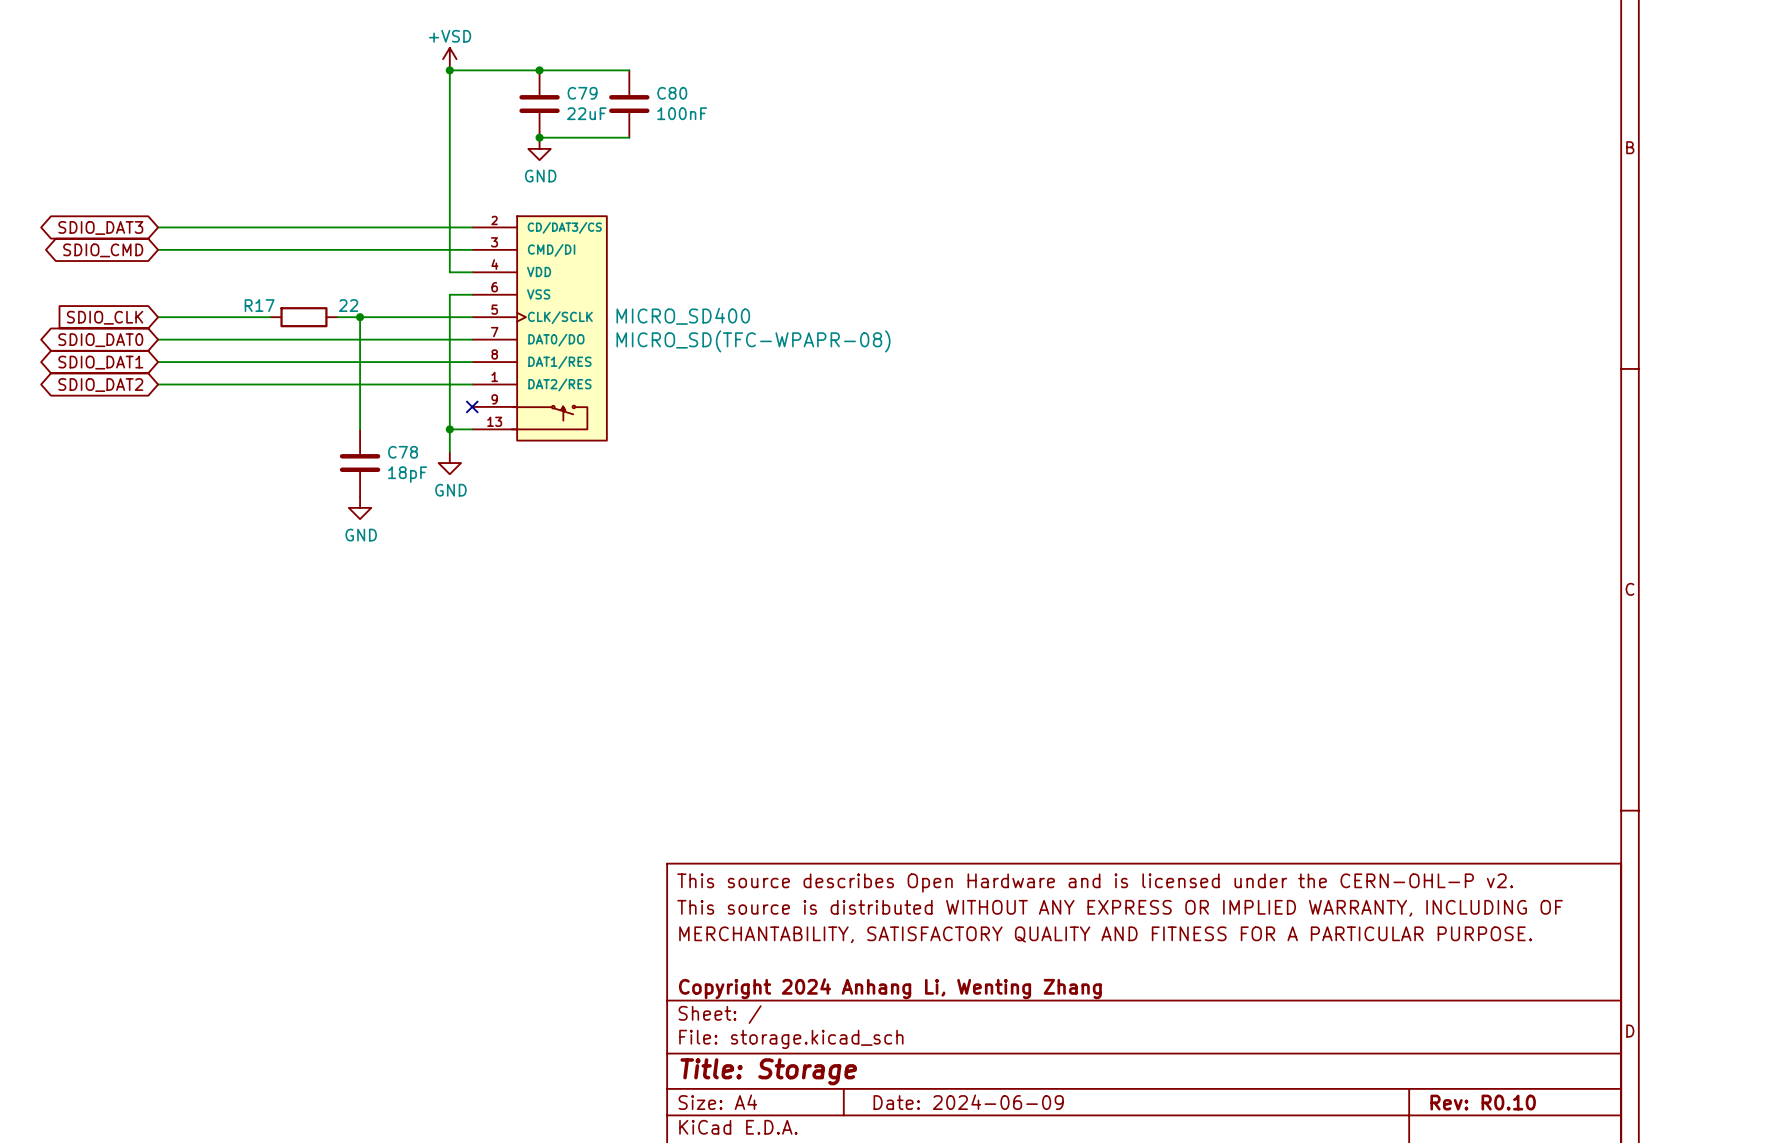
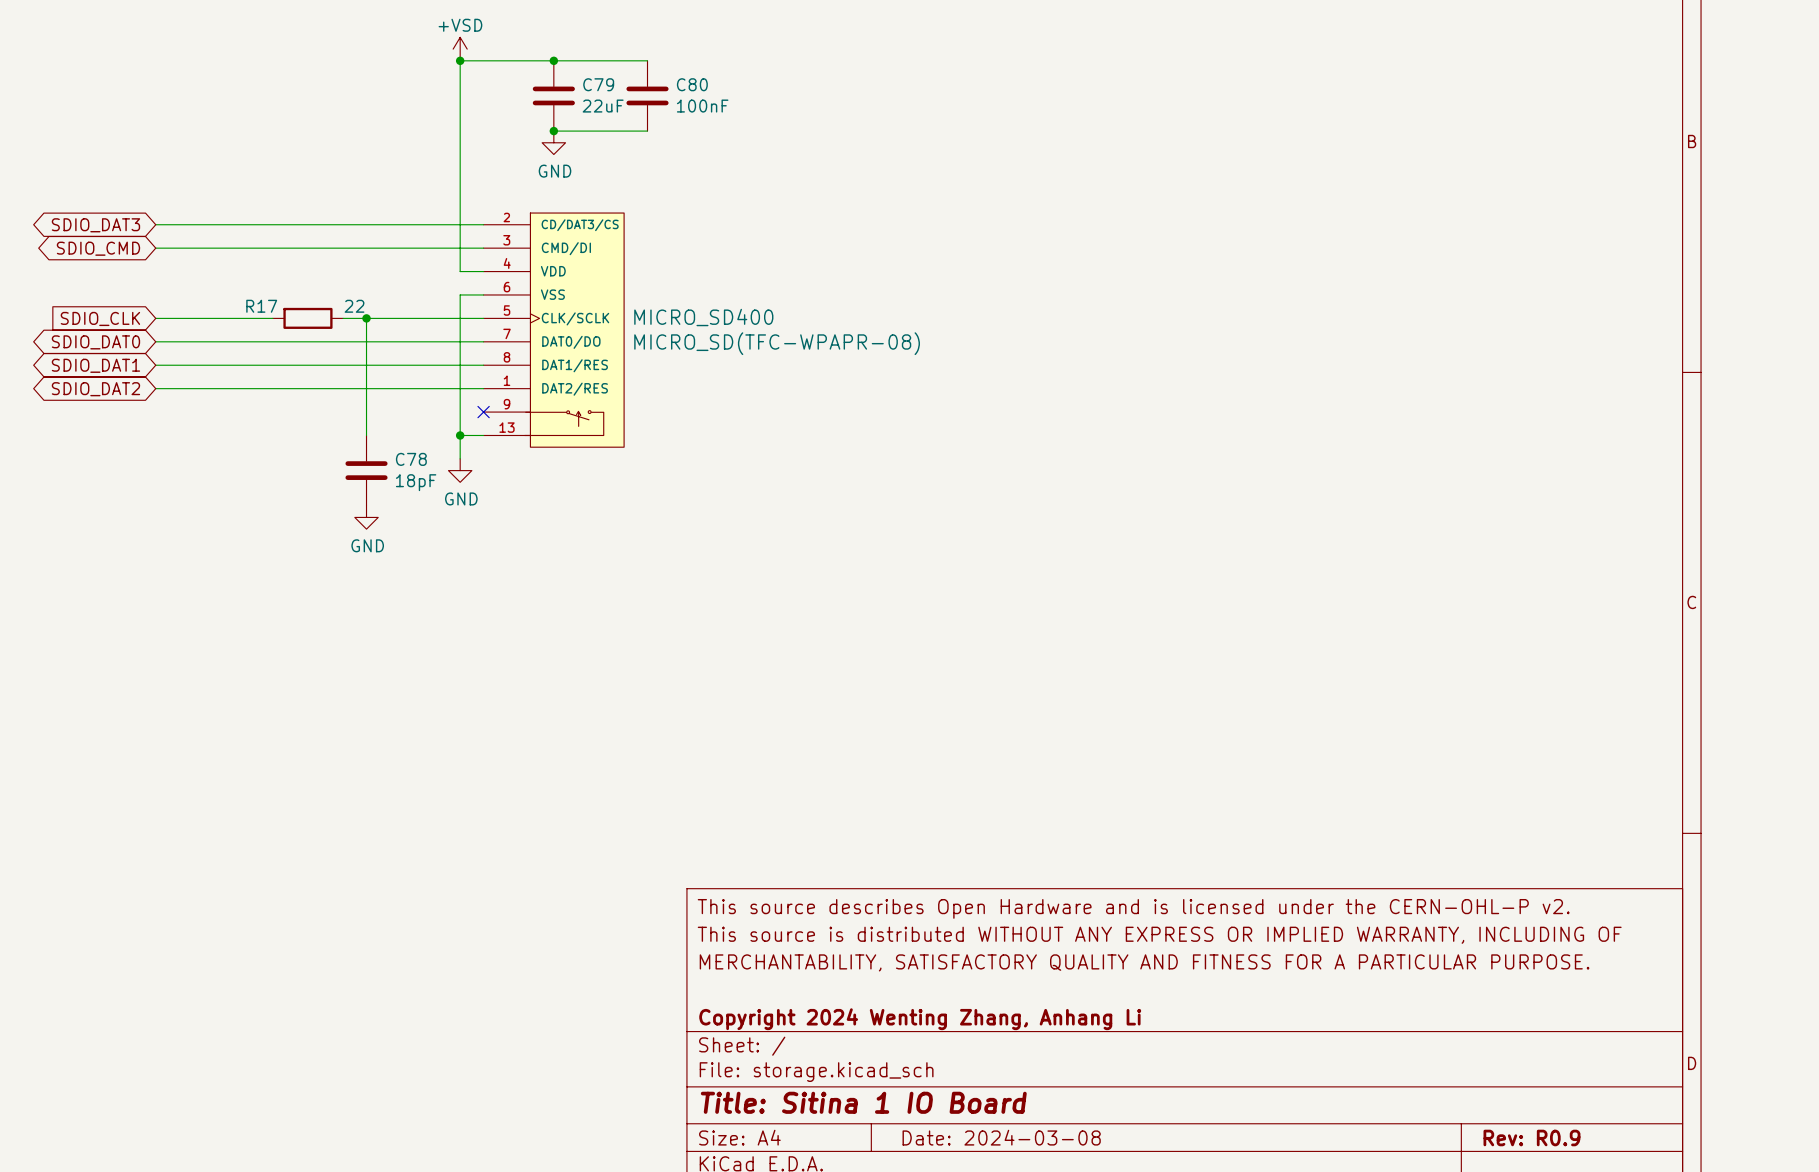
title block: Copyright 2024 Anhang Li, Wenting Zhang (890, 988) -> Copyright 2024 Wenting Zhang, Anhang Li (920, 1019)
title block: Title: Storage (768, 1071) -> Title: Sitina 1 IO Board (863, 1102)
title block: Date: 2024-06-09 (968, 1102) -> Date: 2024-03-08 (1001, 1137)
title block: Rev: R0.10 (1483, 1102) -> Rev: R0.9 (1531, 1137)

